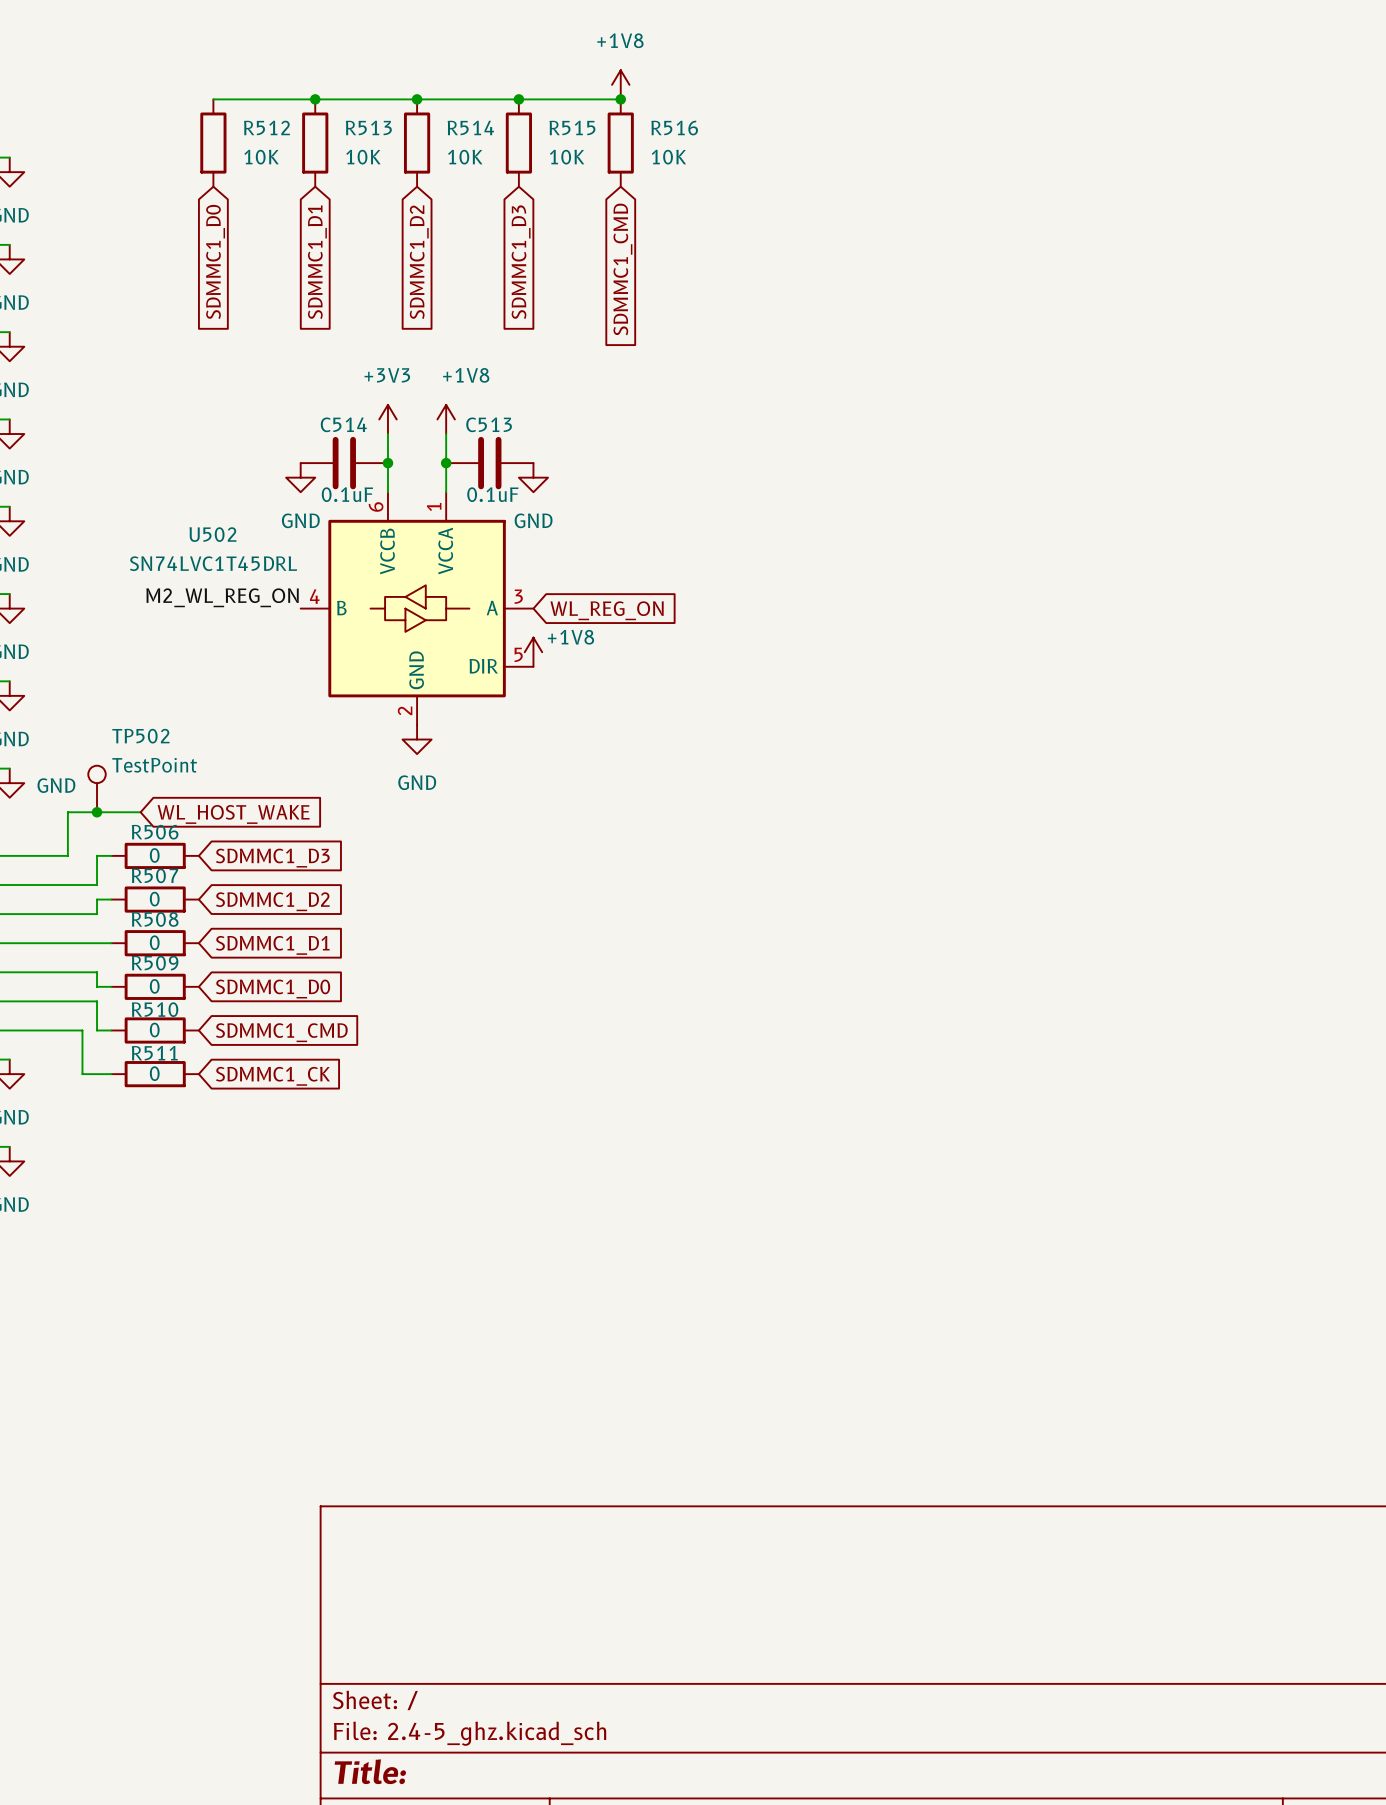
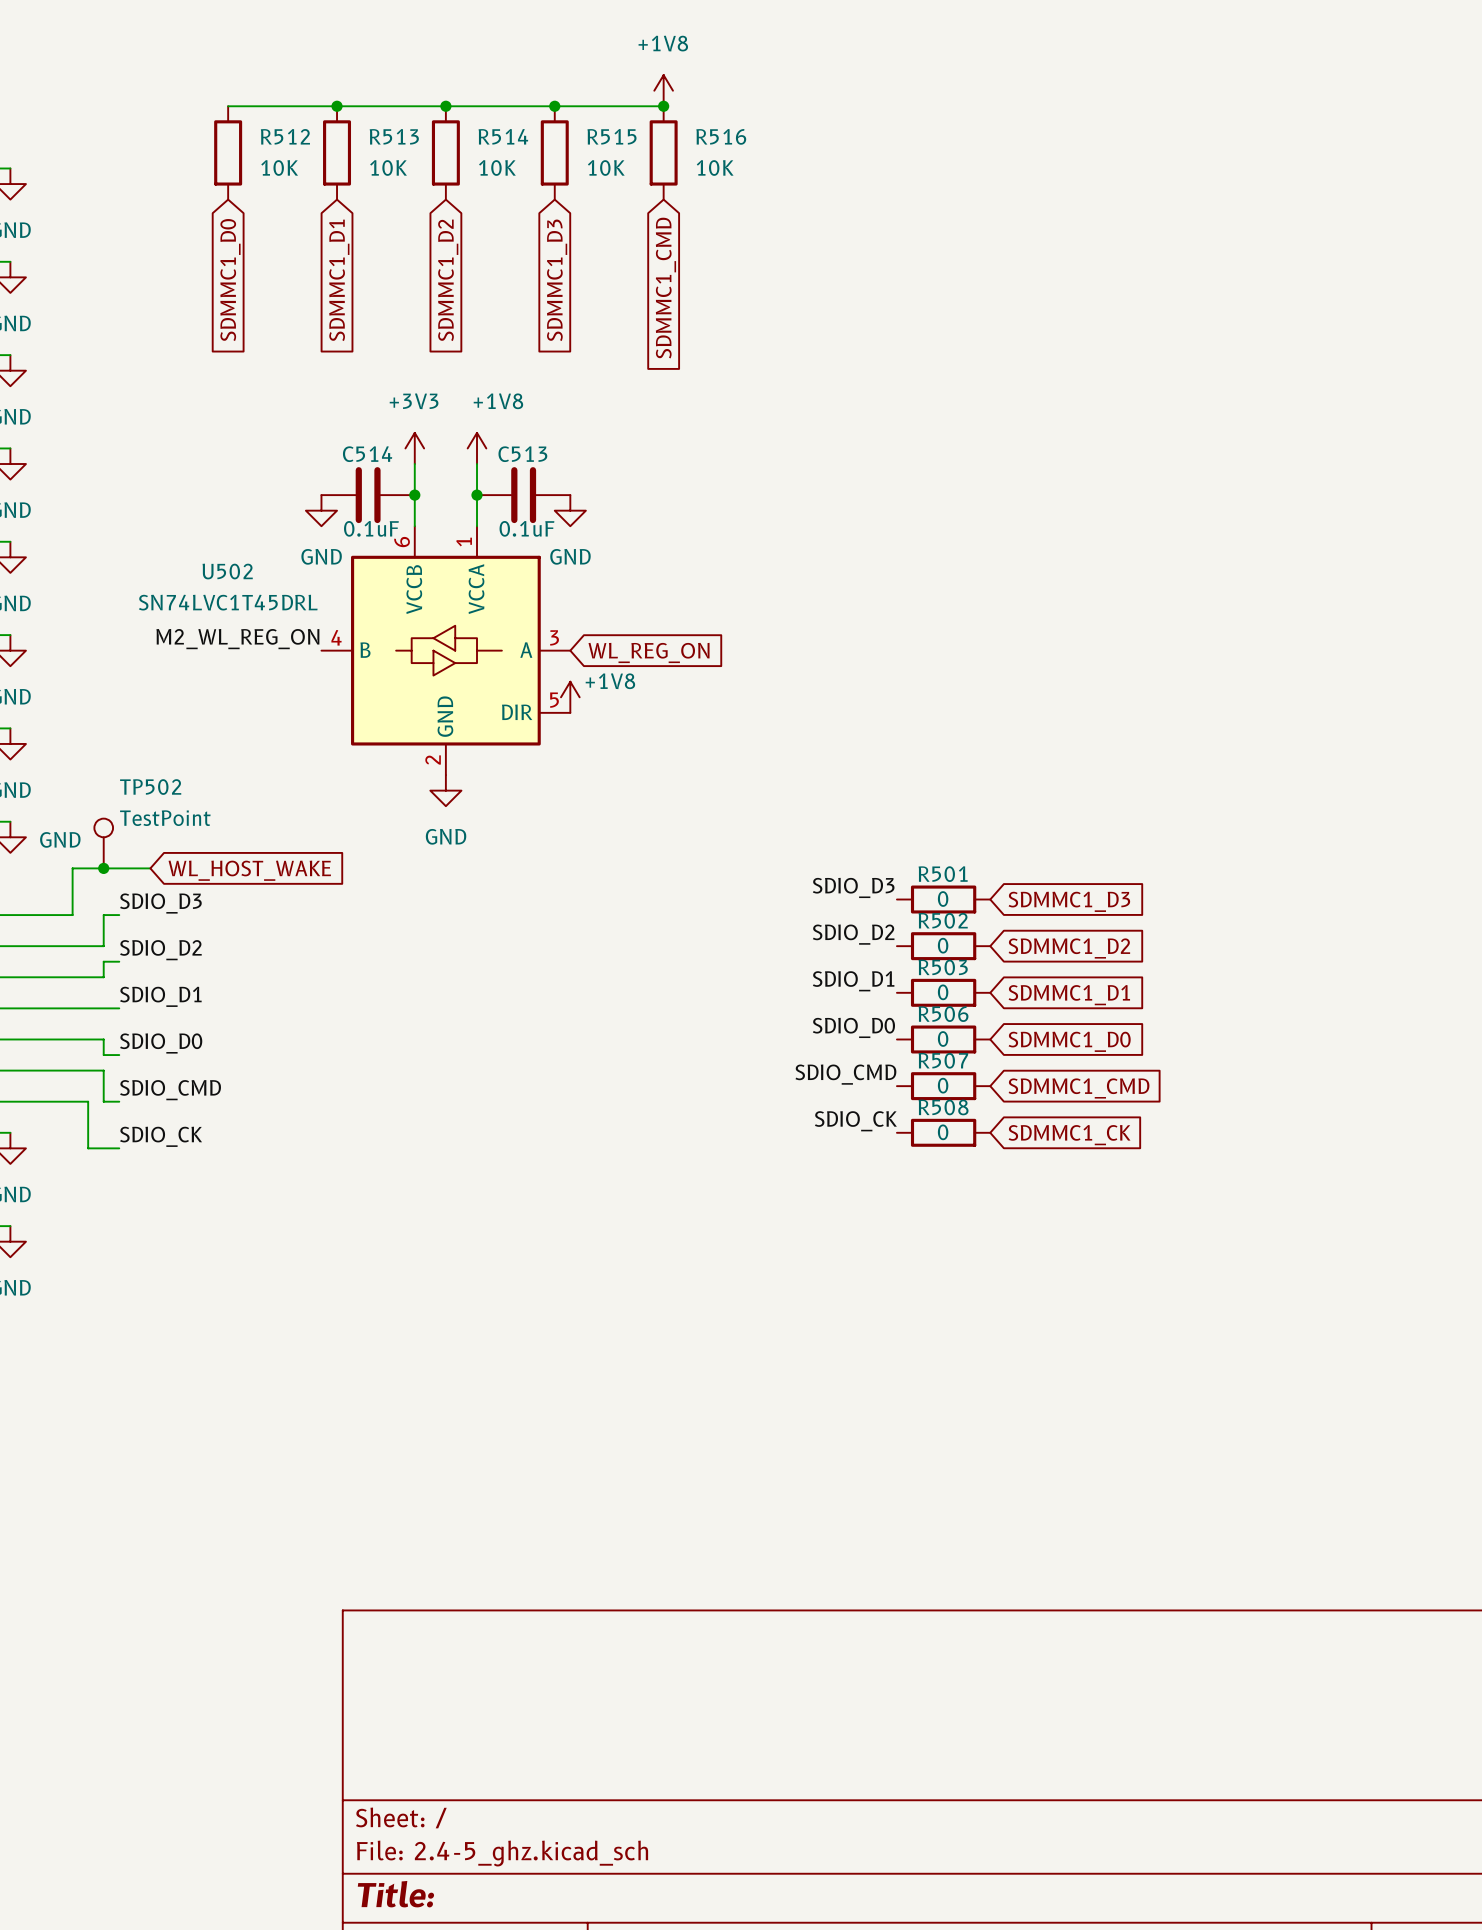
label: none -> SDIO_D3 (853, 887)
R501: none -> 0 (943, 899)
global label: none -> SDMMC1_D3 (1069, 901)
label: none -> SDIO_D3 (160, 903)
R506 position: (155, 855) -> (943, 1039)
global label: SDMMC1_D3 (272, 858) -> none
label: none -> SDIO_D2 (853, 934)
R502: none -> 0 (943, 946)
global label: none -> SDMMC1_D2 (1069, 948)
label: none -> SDIO_D2 (160, 950)
R507 position: (155, 899) -> (943, 1086)
global label: SDMMC1_D2 (272, 901) -> none
label: none -> SDIO_D1 (853, 981)
R503: none -> 0 (943, 992)
global label: none -> SDMMC1_D1 (1069, 995)
label: none -> SDIO_D1 (160, 996)
R508 position: (155, 943) -> (943, 1132)
global label: SDMMC1_D1 (272, 945) -> none
label: none -> SDIO_D0 (853, 1027)
global label: none -> SDMMC1_D0 (1069, 1041)
label: none -> SDIO_D0 (161, 1043)
R509: 0 (155, 986) -> none
global label: SDMMC1_D0 (273, 989) -> none
label: none -> SDIO_CMD (845, 1074)
global label: none -> SDMMC1_CMD (1079, 1088)
label: none -> SDIO_CMD (170, 1090)
R510: 0 (155, 1030) -> none
global label: SDMMC1_CMD (281, 1032) -> none
label: none -> SDIO_CK (855, 1121)
global label: none -> SDMMC1_CK (1069, 1135)
label: none -> SDIO_CK (161, 1136)
R511: 0 (155, 1074) -> none
global label: SDMMC1_CK (272, 1076) -> none

